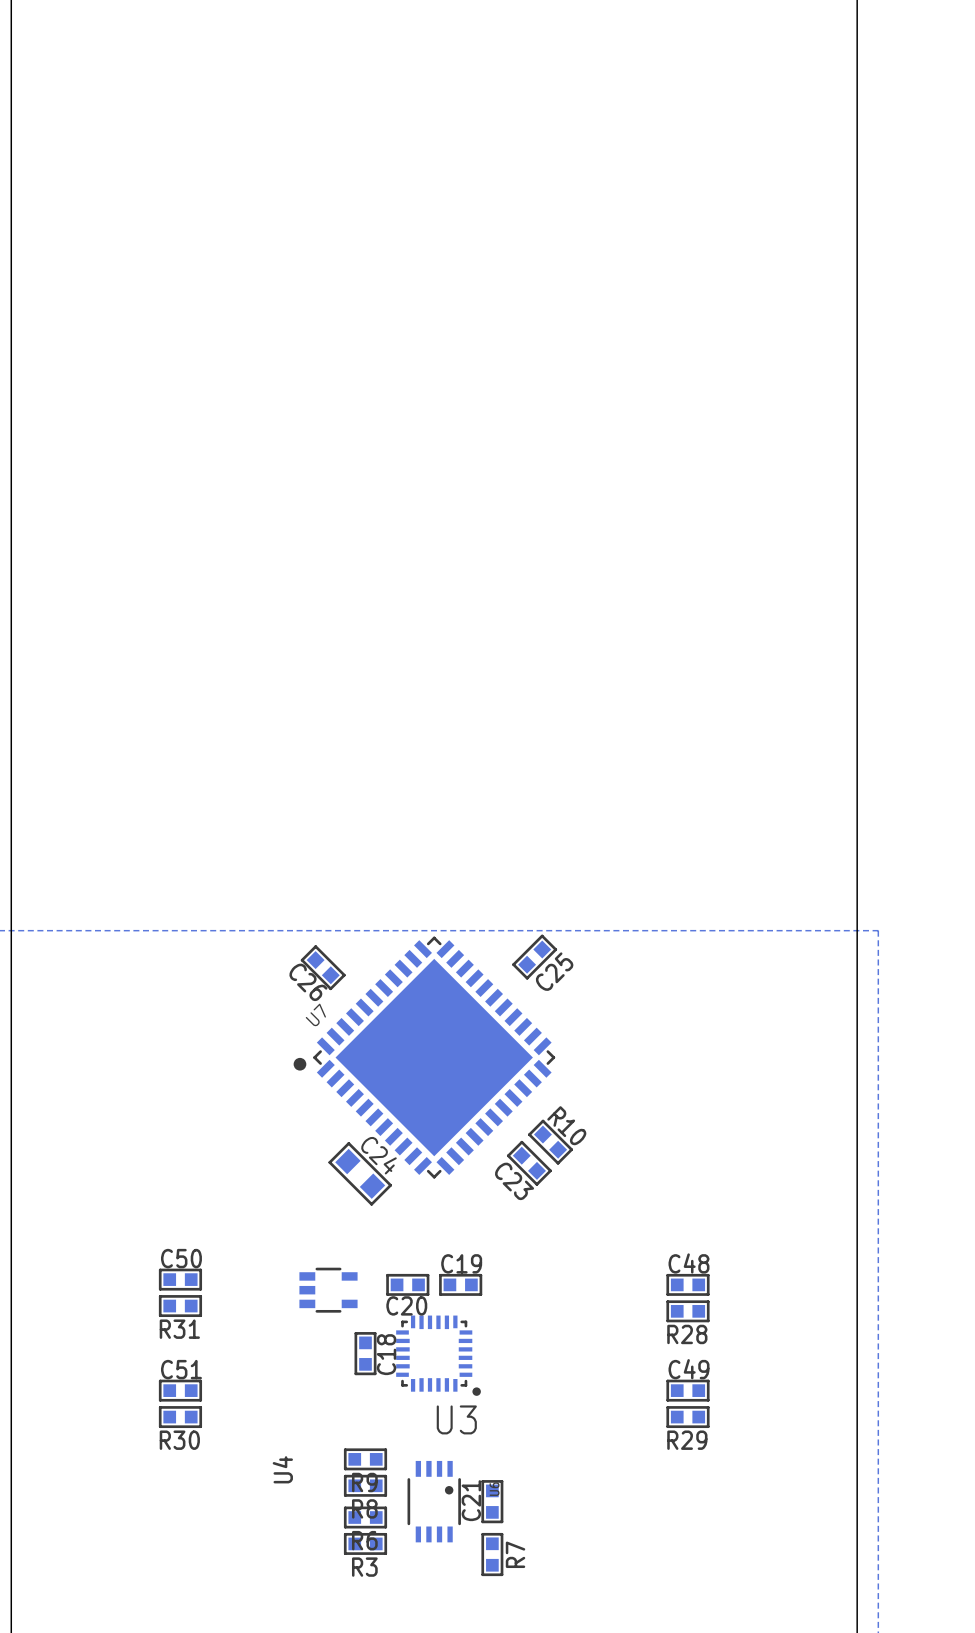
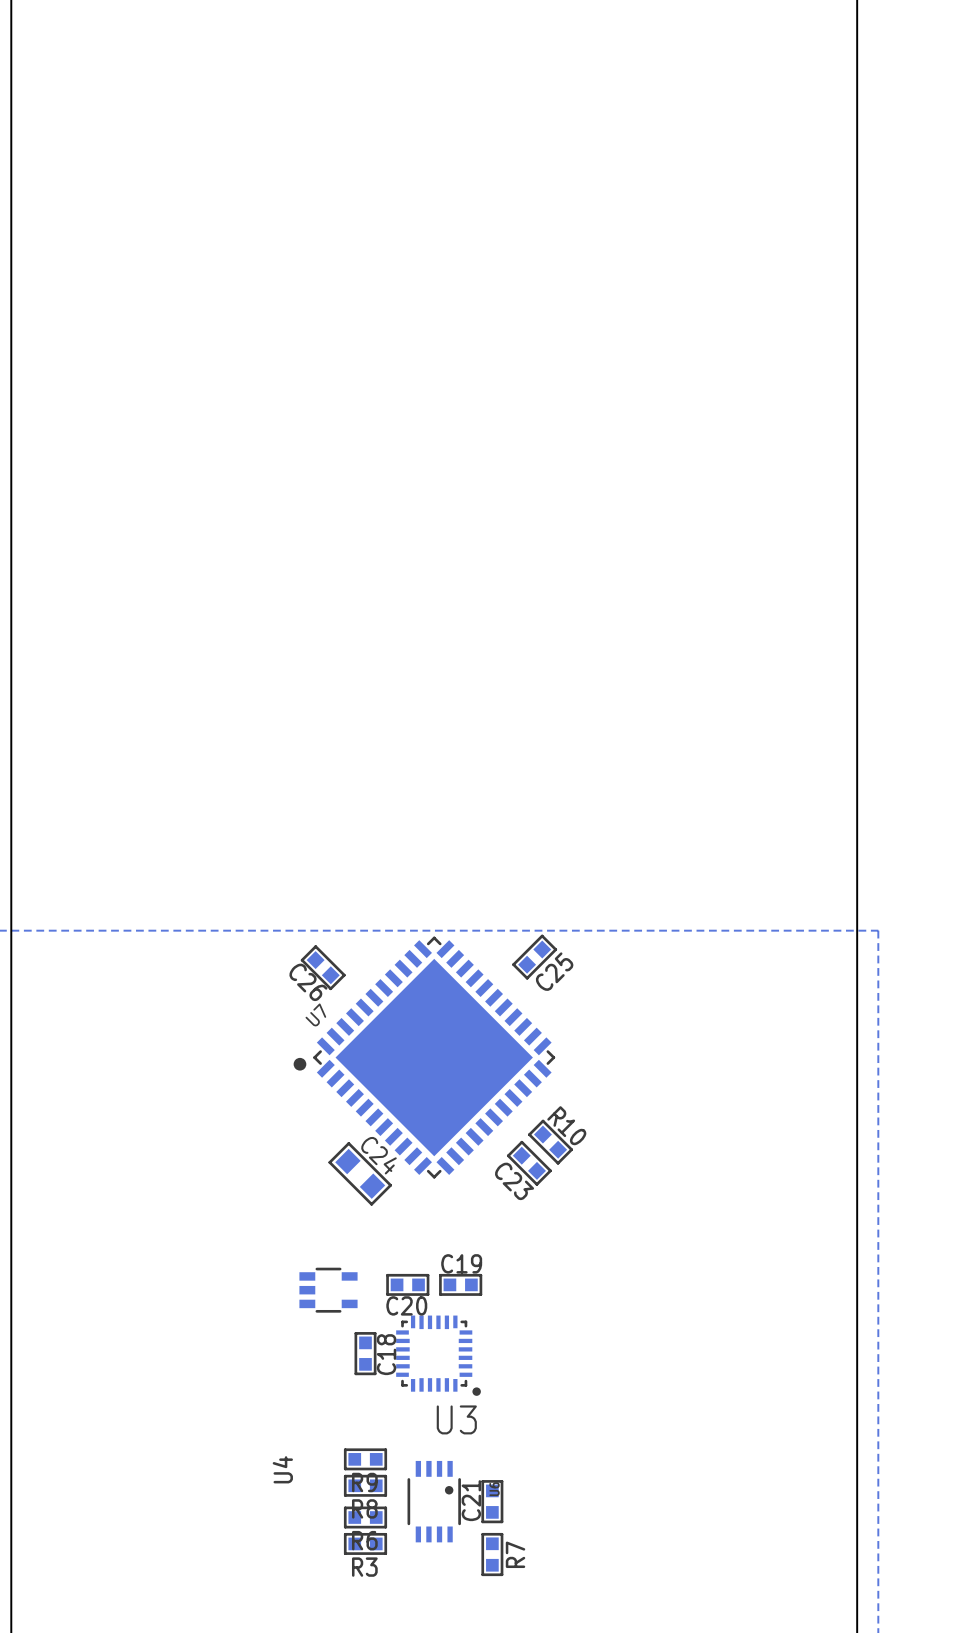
C50: (180, 1279) -> none
C48: (687, 1284) -> none
R31: (180, 1306) -> none
R28: (687, 1311) -> none
C51: (180, 1390) -> none
C49: (687, 1390) -> none
R30: (180, 1417) -> none
R29: (687, 1417) -> none

